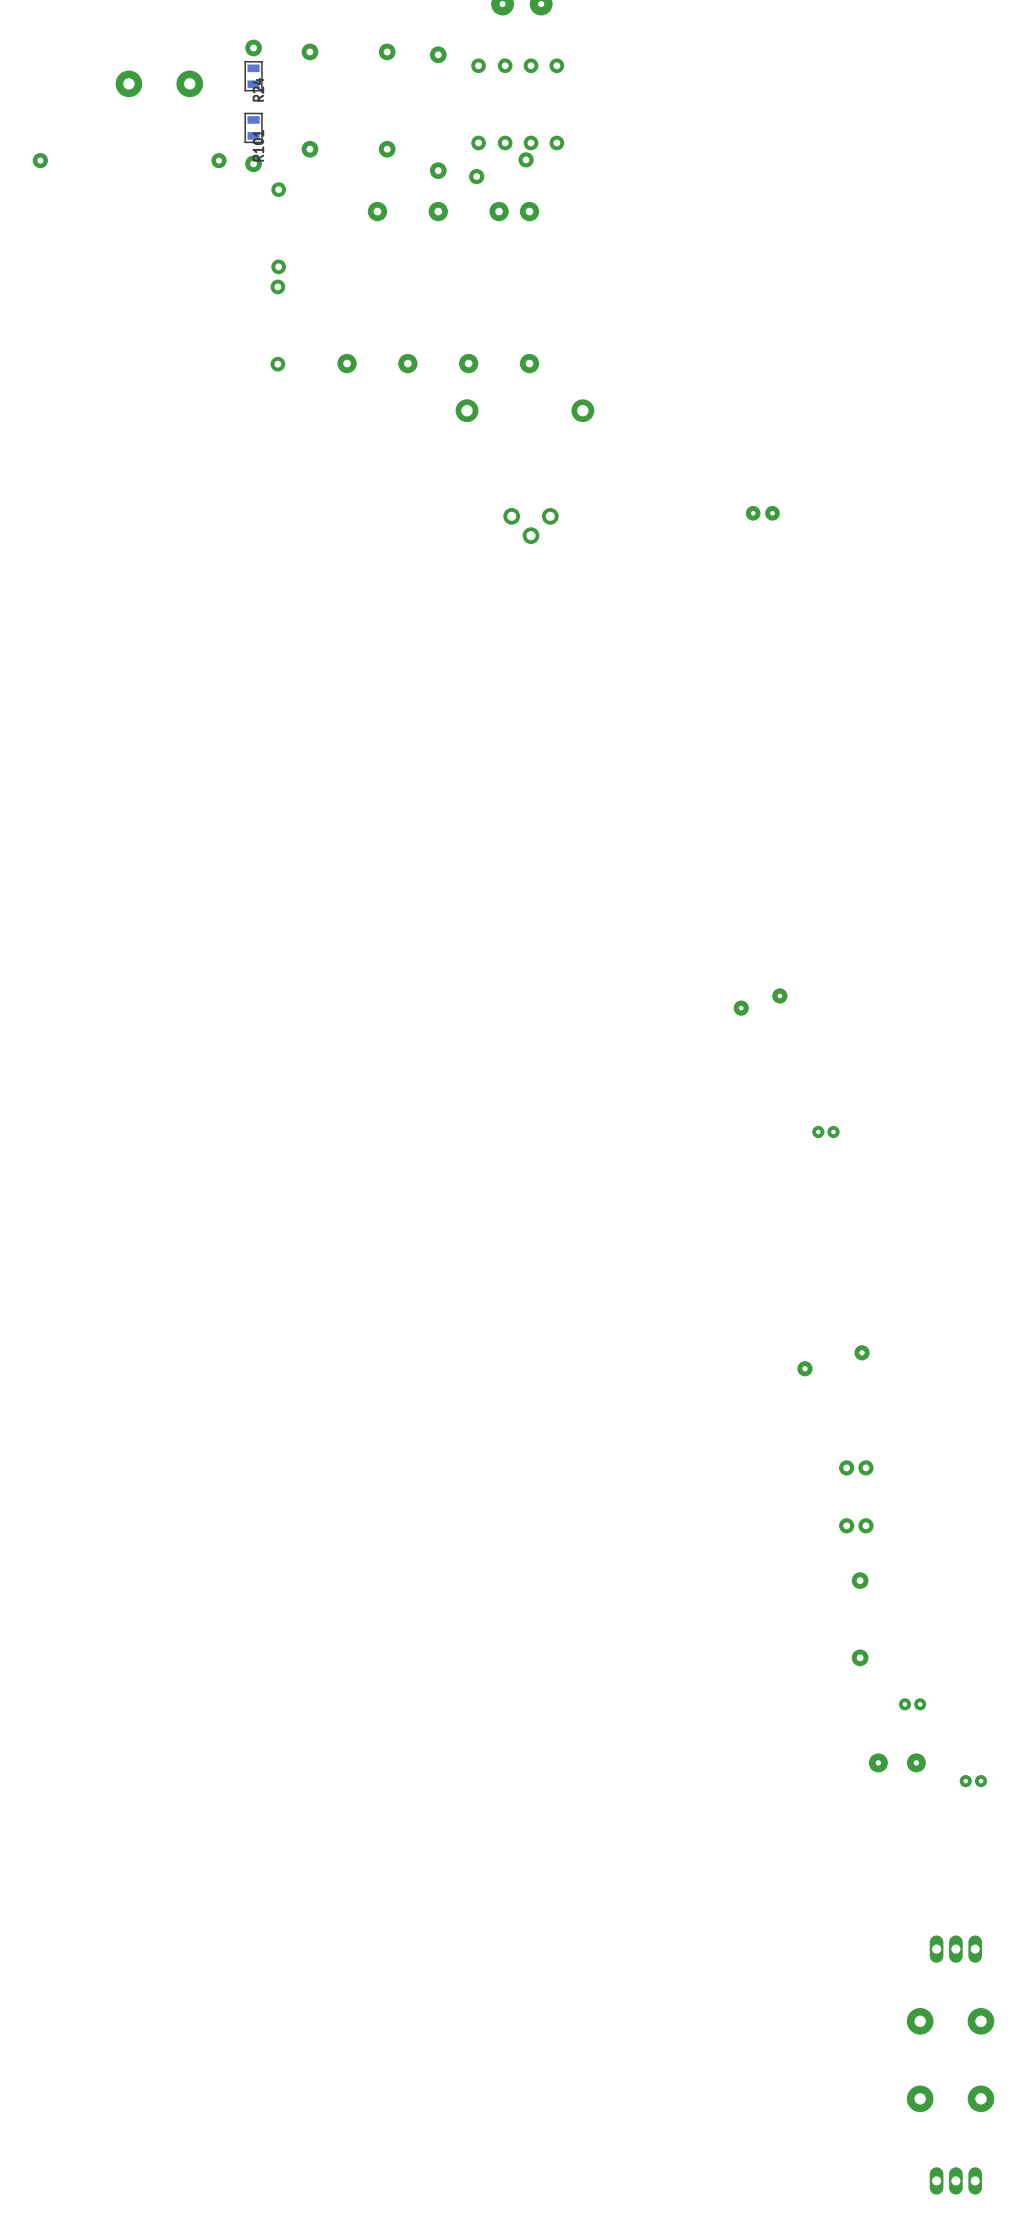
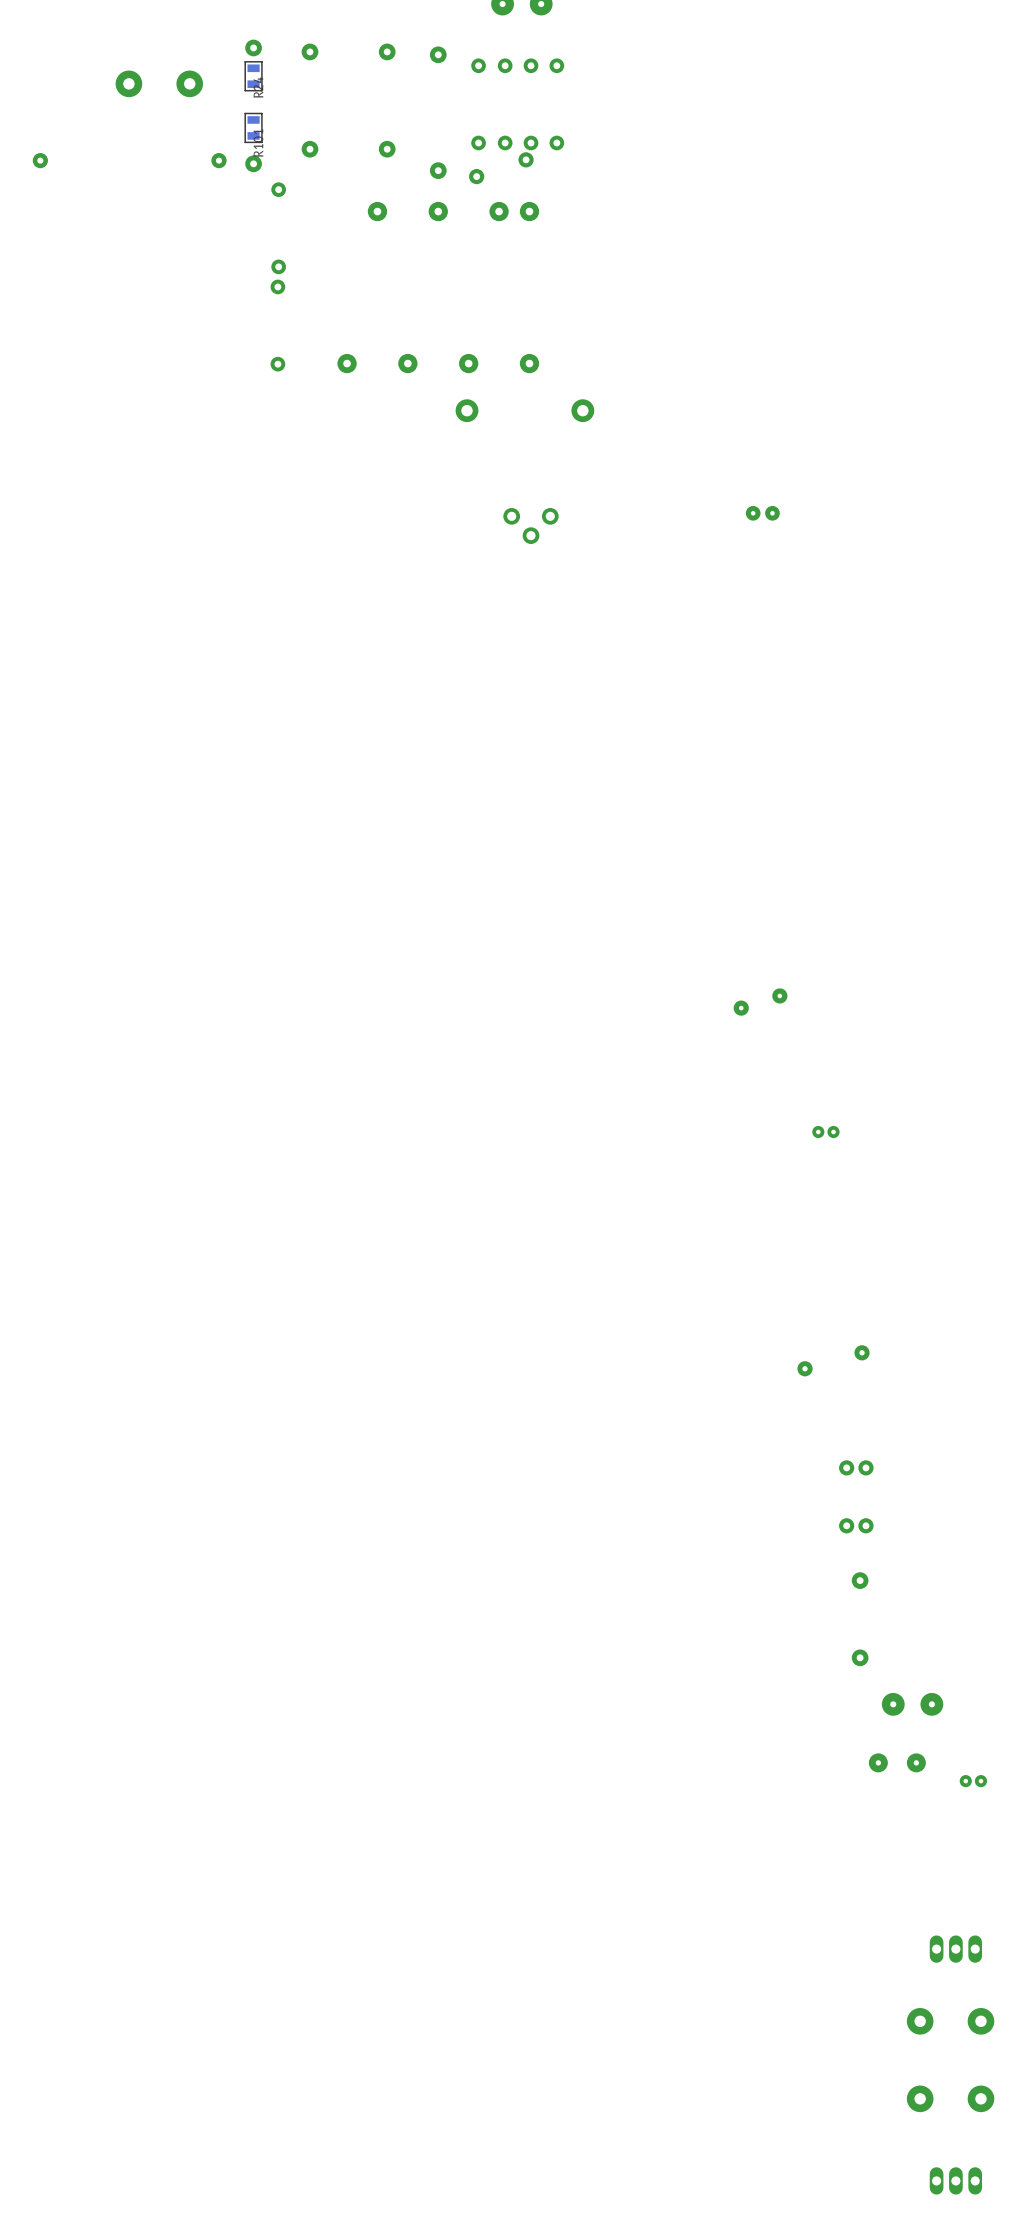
part footprint: [898, 1698, 927, 1711] -> [881, 1692, 944, 1716]

